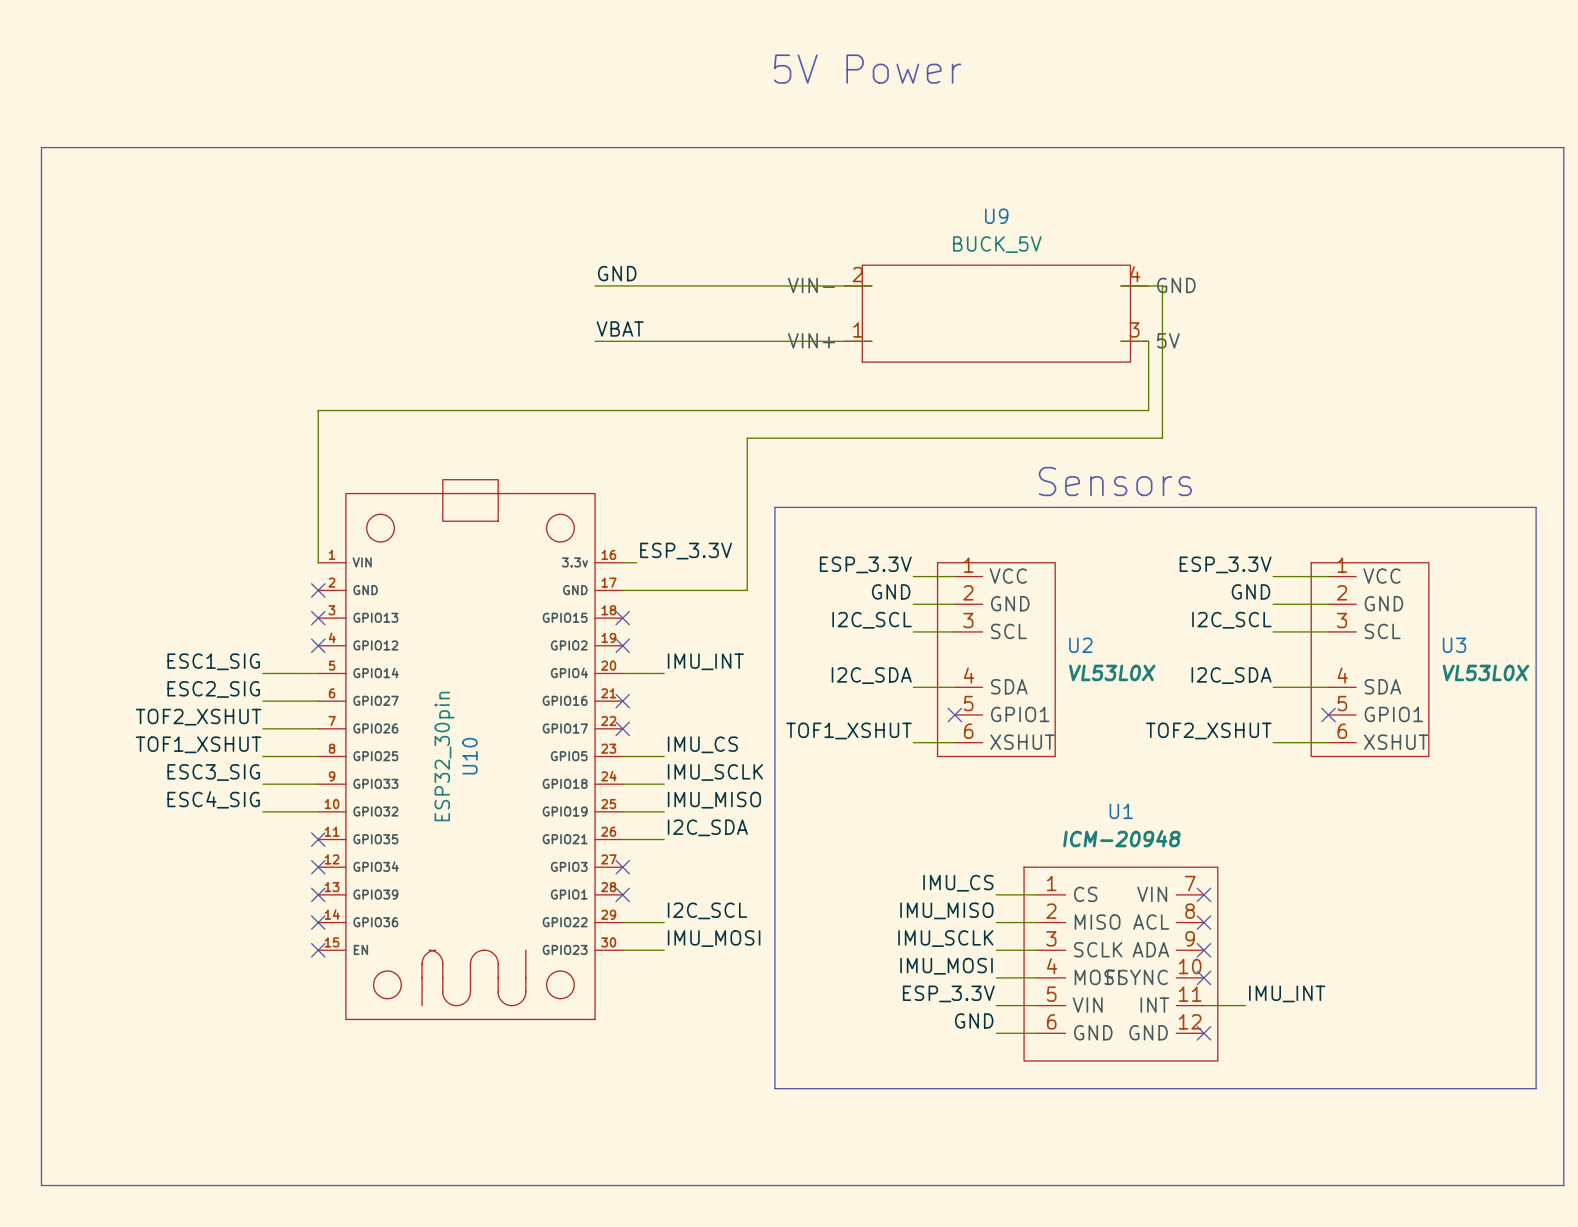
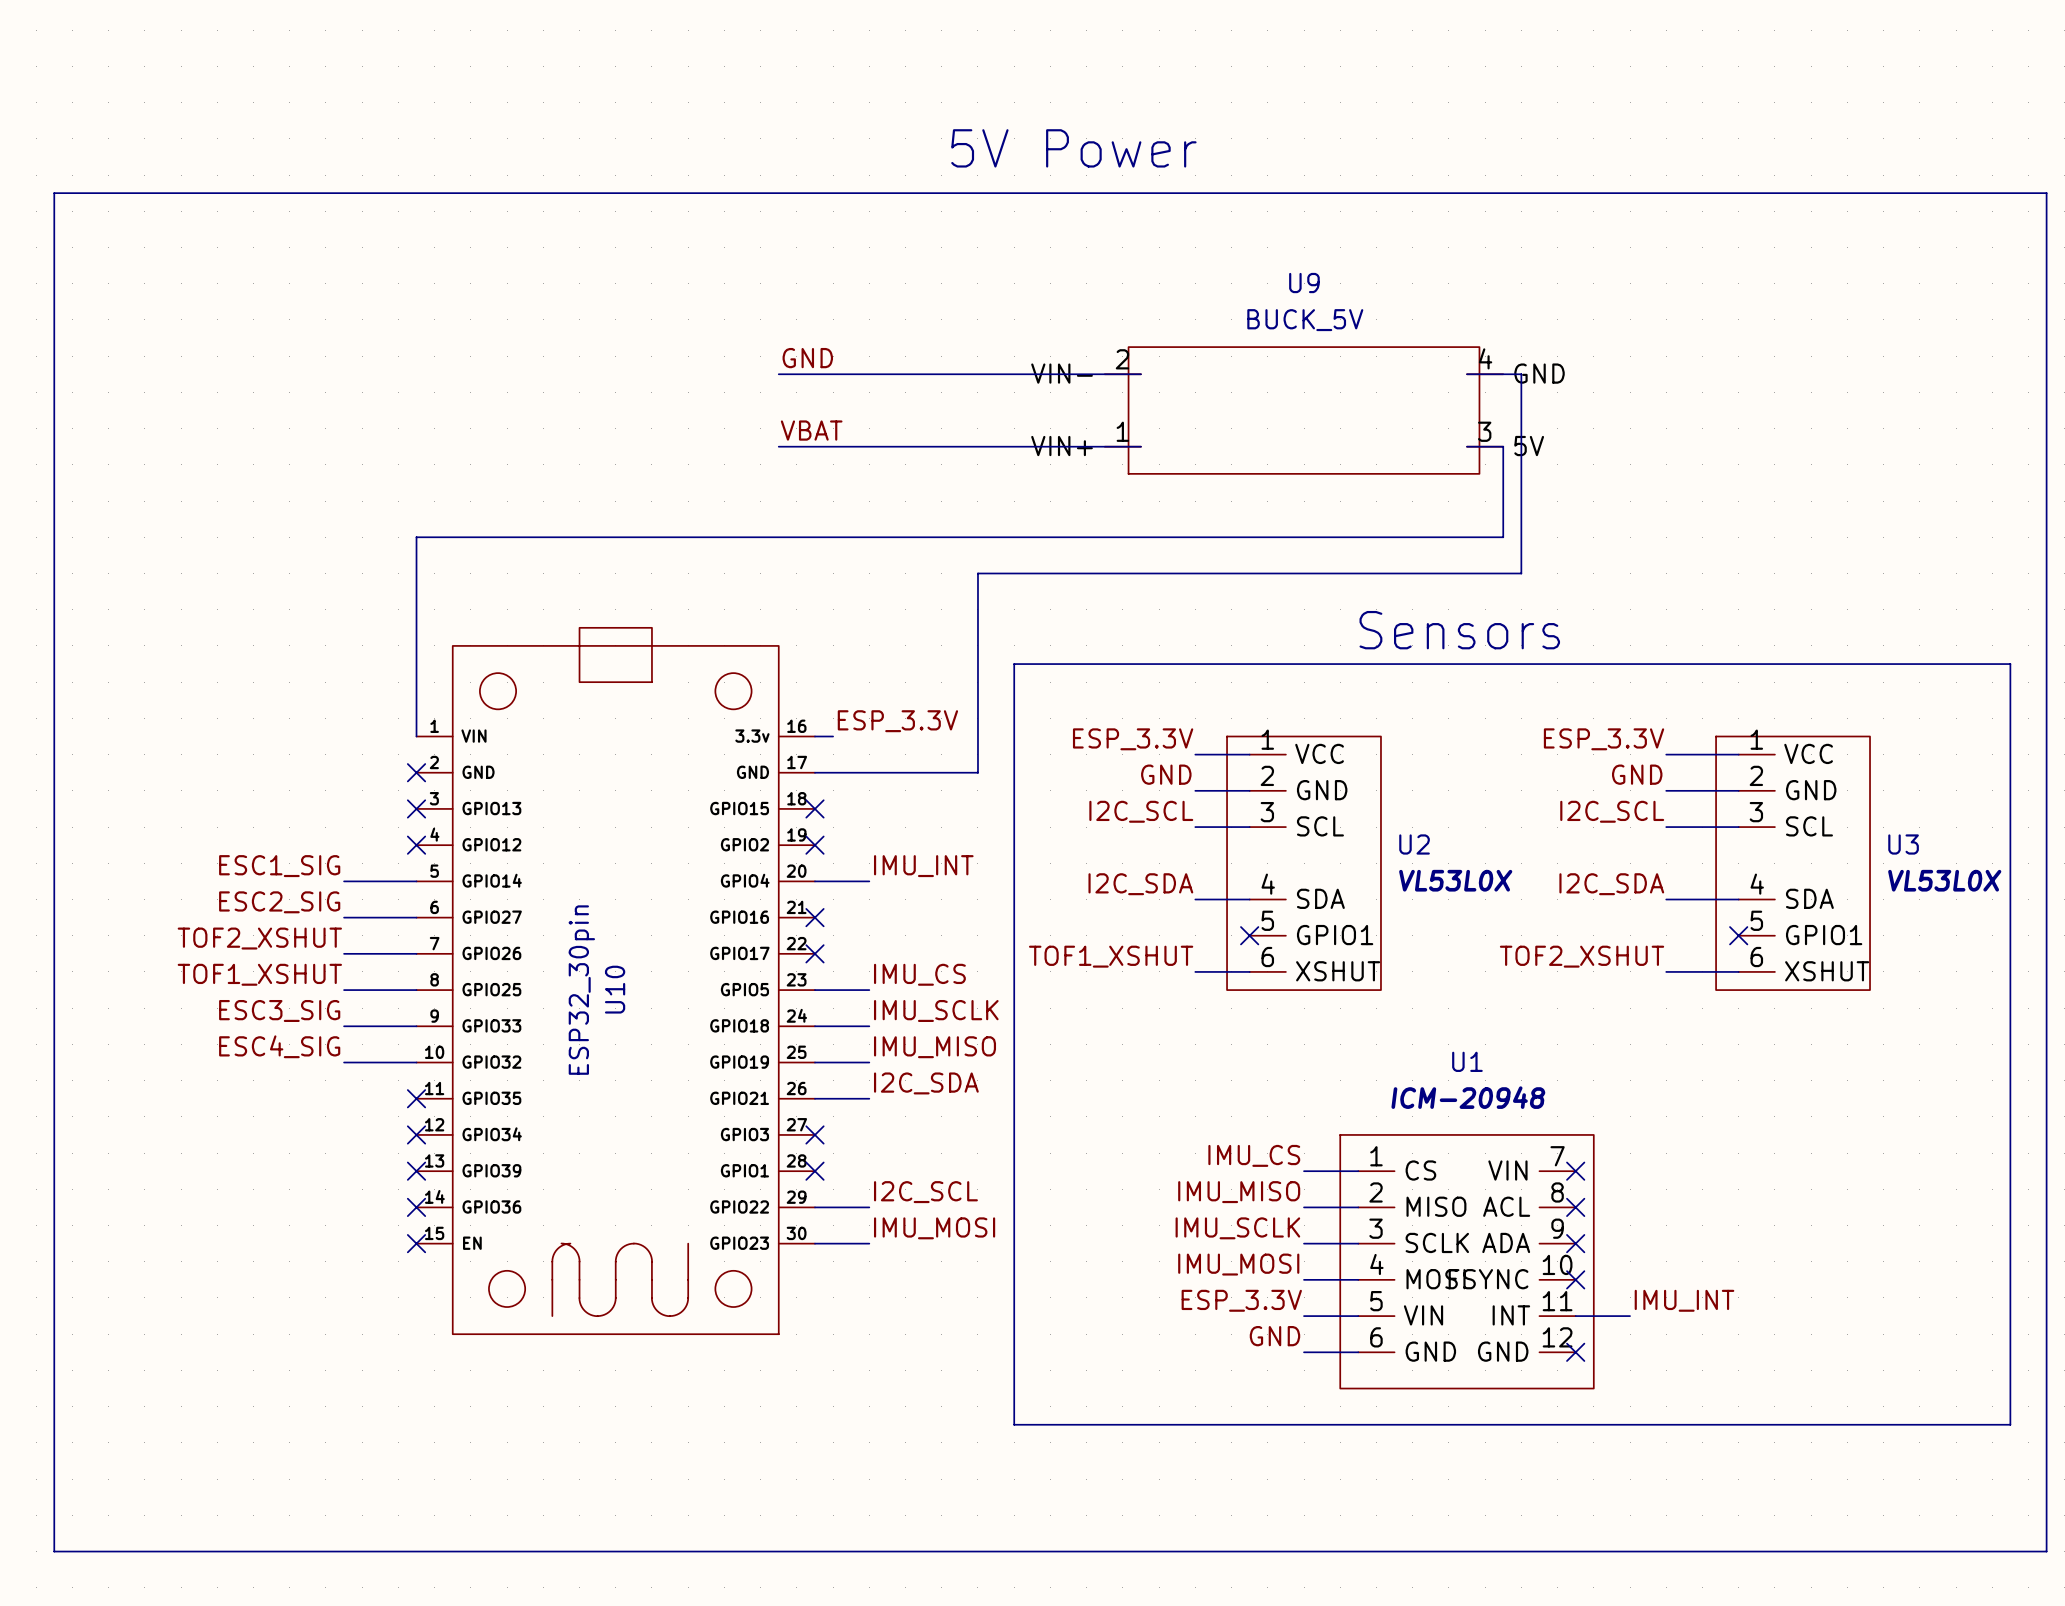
text position: 5V Power (867, 69) -> 5V Power (1073, 148)

